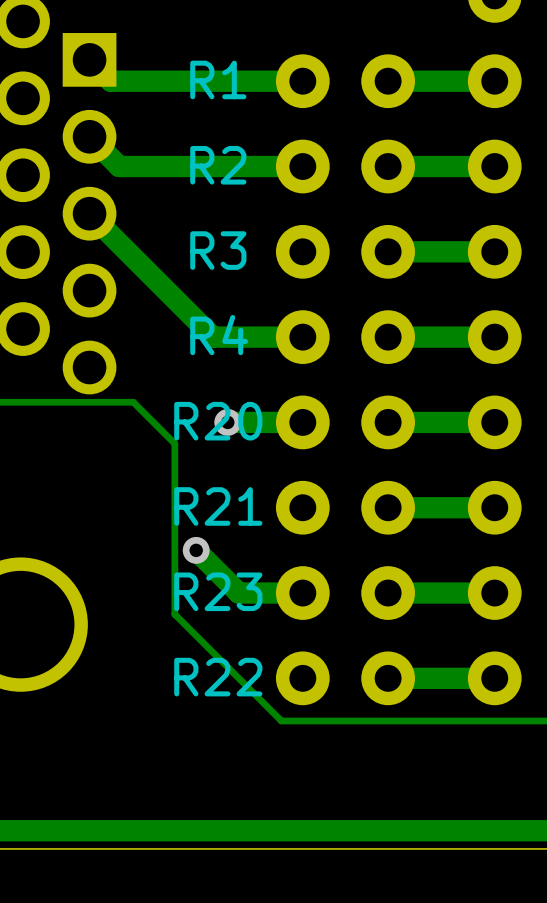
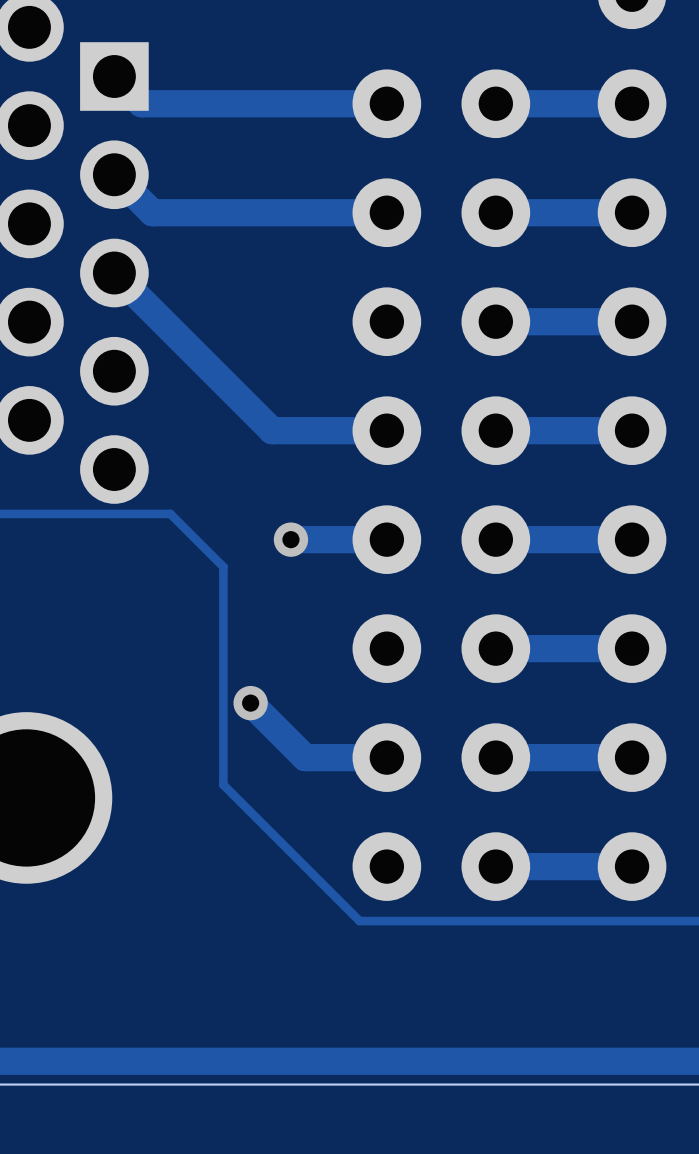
R1 name: R1 (218, 79) -> none
R2 name: R2 (218, 165) -> none
R3 name: R3 (218, 250) -> none
R4 name: R4 (219, 335) -> none
R20 name: R20 (218, 421) -> none
R21 name: R21 (218, 506) -> none
R23 name: R23 (218, 591) -> none
R22 name: R22 (218, 677) -> none

